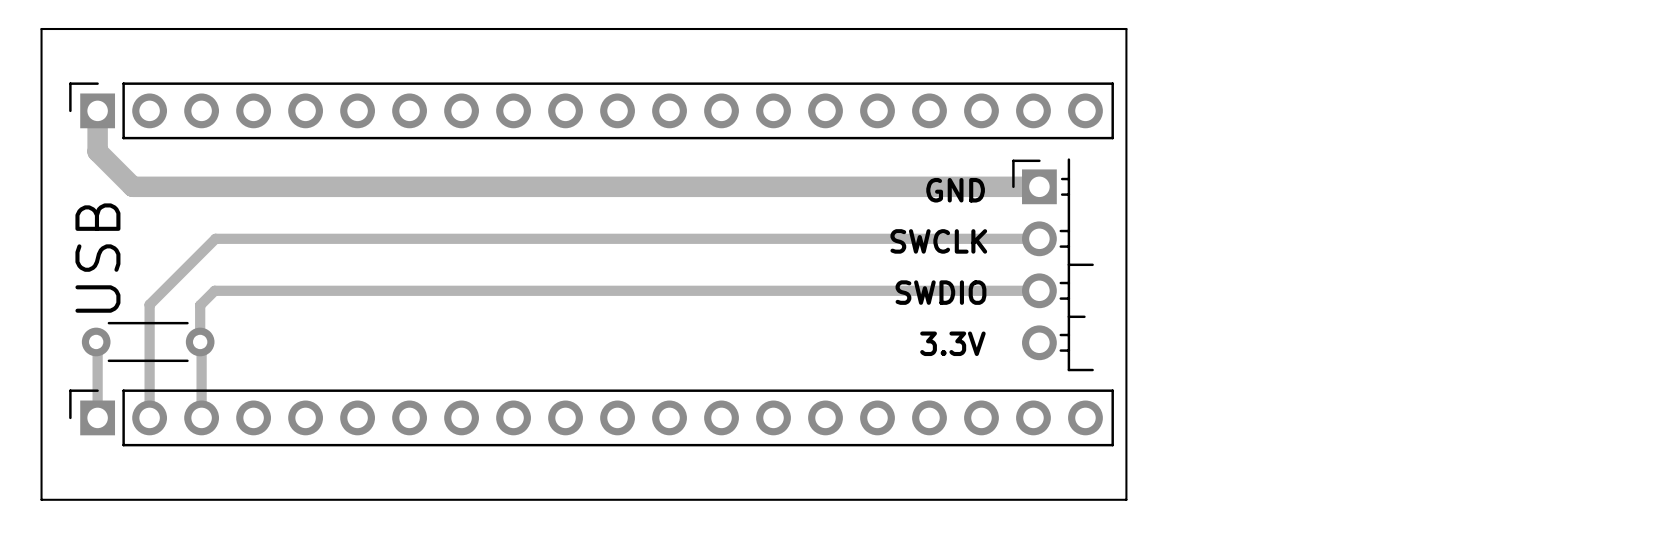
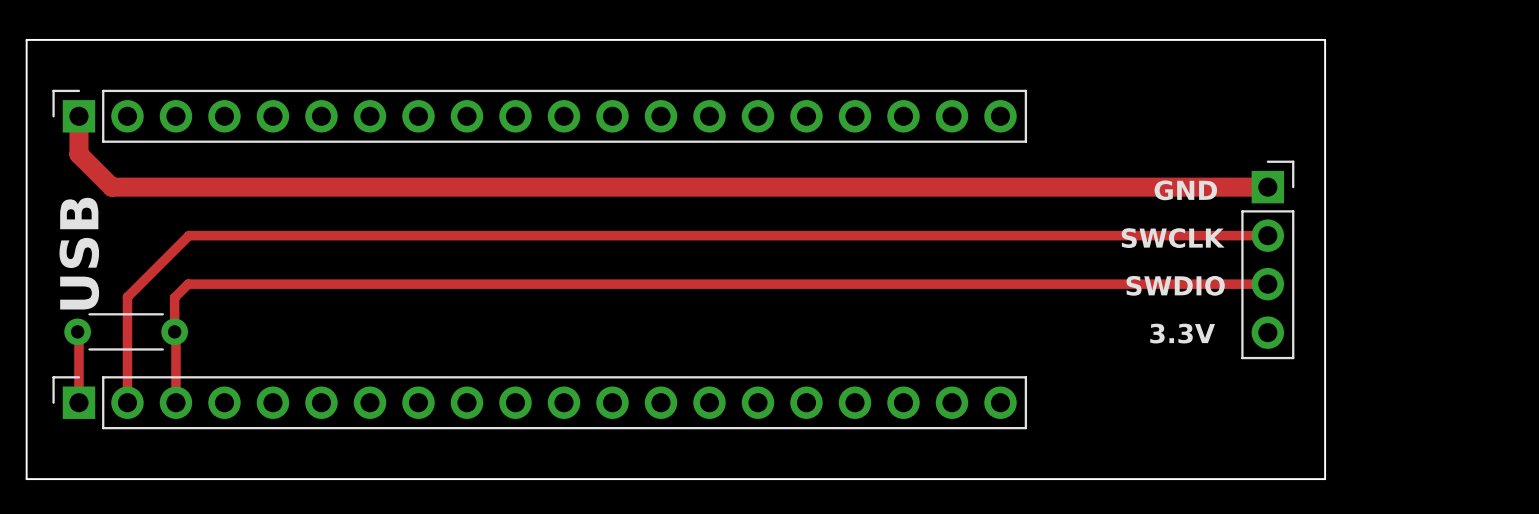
board edge: (1126, 29) (1126, 499) -> (1038, 39) (1325, 39) (1325, 479) (1038, 479)
track: none -> (957, 187) (1267, 187)
text position: GND (955, 190) -> GND (1185, 190)
track: none -> (957, 235) (1267, 235)
text position: SWCLK (938, 241) -> SWCLK (1173, 238)
part: (1053, 264) -> none
part: none -> (1267, 259)
track: none -> (957, 284) (1267, 284)
text position: SWDIO (940, 292) -> SWDIO (1175, 285)
text position: 3.3V (952, 343) -> 3.3V (1182, 333)

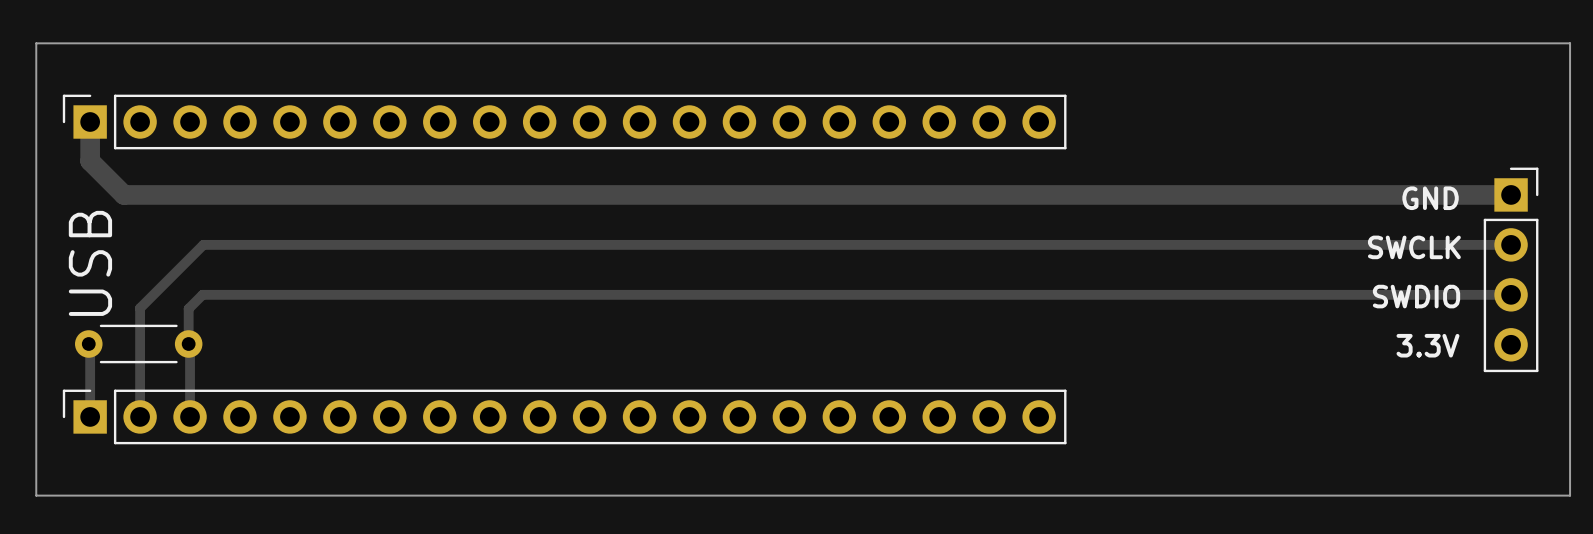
board edge: (1325, 39) (1325, 479) -> (1373, 43) (1570, 43) (1570, 495) (1373, 495)
track: none -> (1314, 194) (1511, 194)
text position: GND (1185, 190) -> GND (1430, 198)
track: none -> (1314, 244) (1511, 244)
text position: SWCLK (1173, 238) -> SWCLK (1414, 247)
part position: (1267, 259) -> (1511, 269)
track: none -> (1314, 294) (1511, 294)
text position: SWDIO (1175, 285) -> SWDIO (1416, 296)
text position: 3.3V (1182, 333) -> 3.3V (1427, 345)

